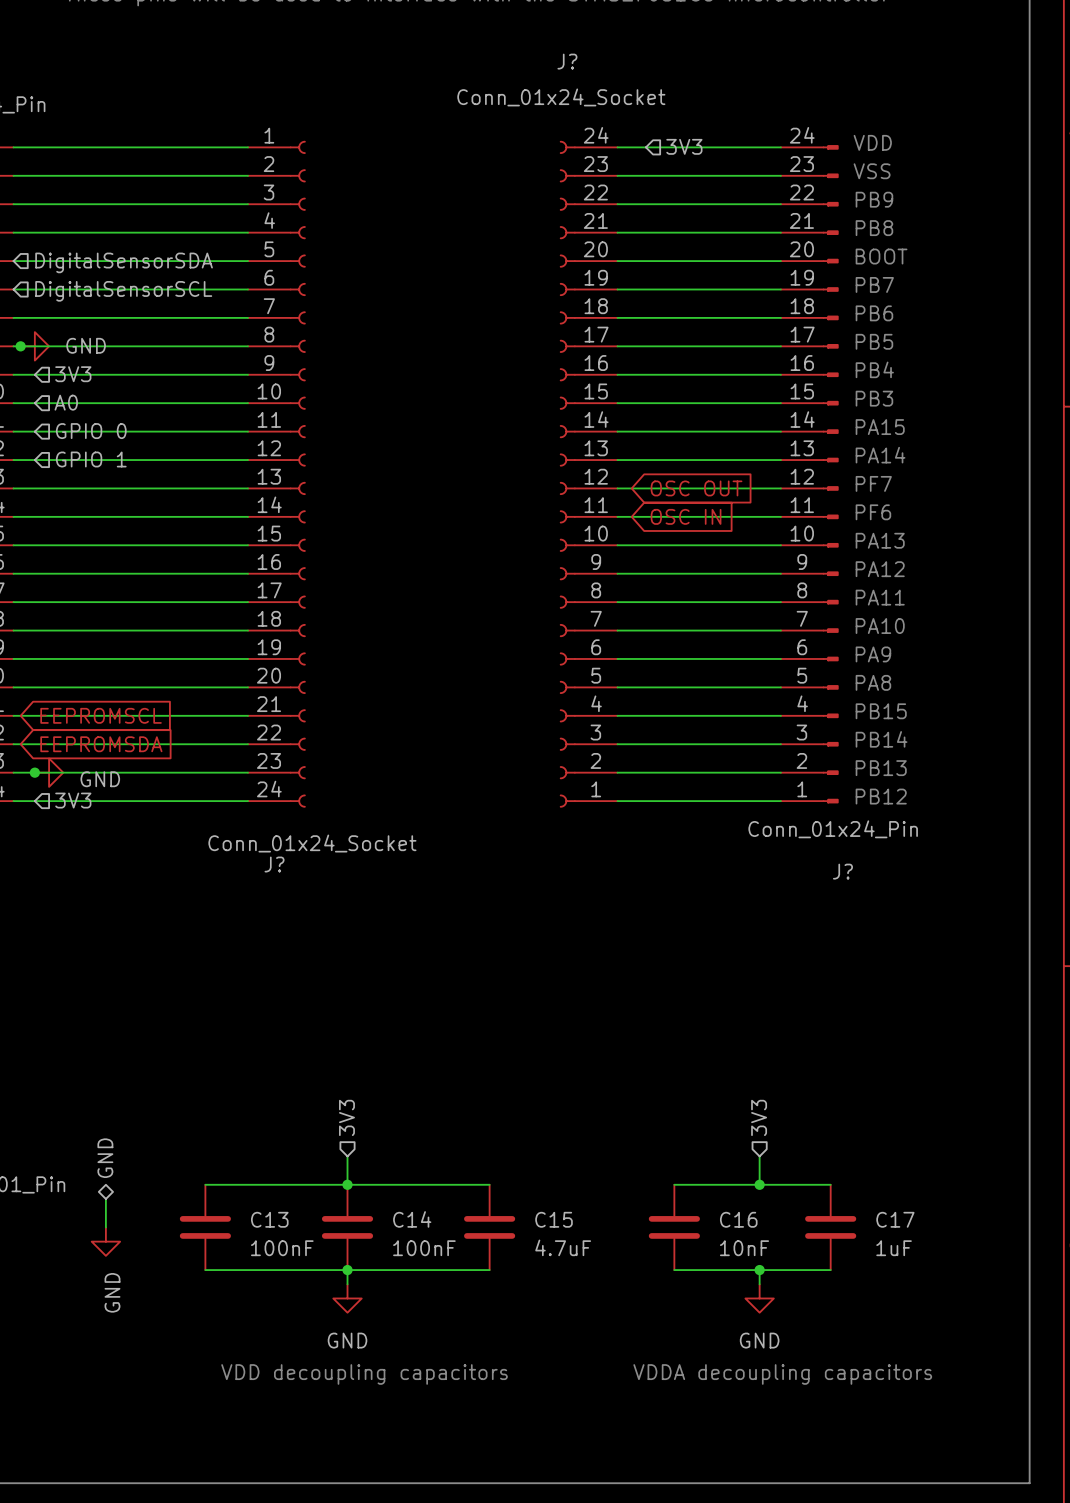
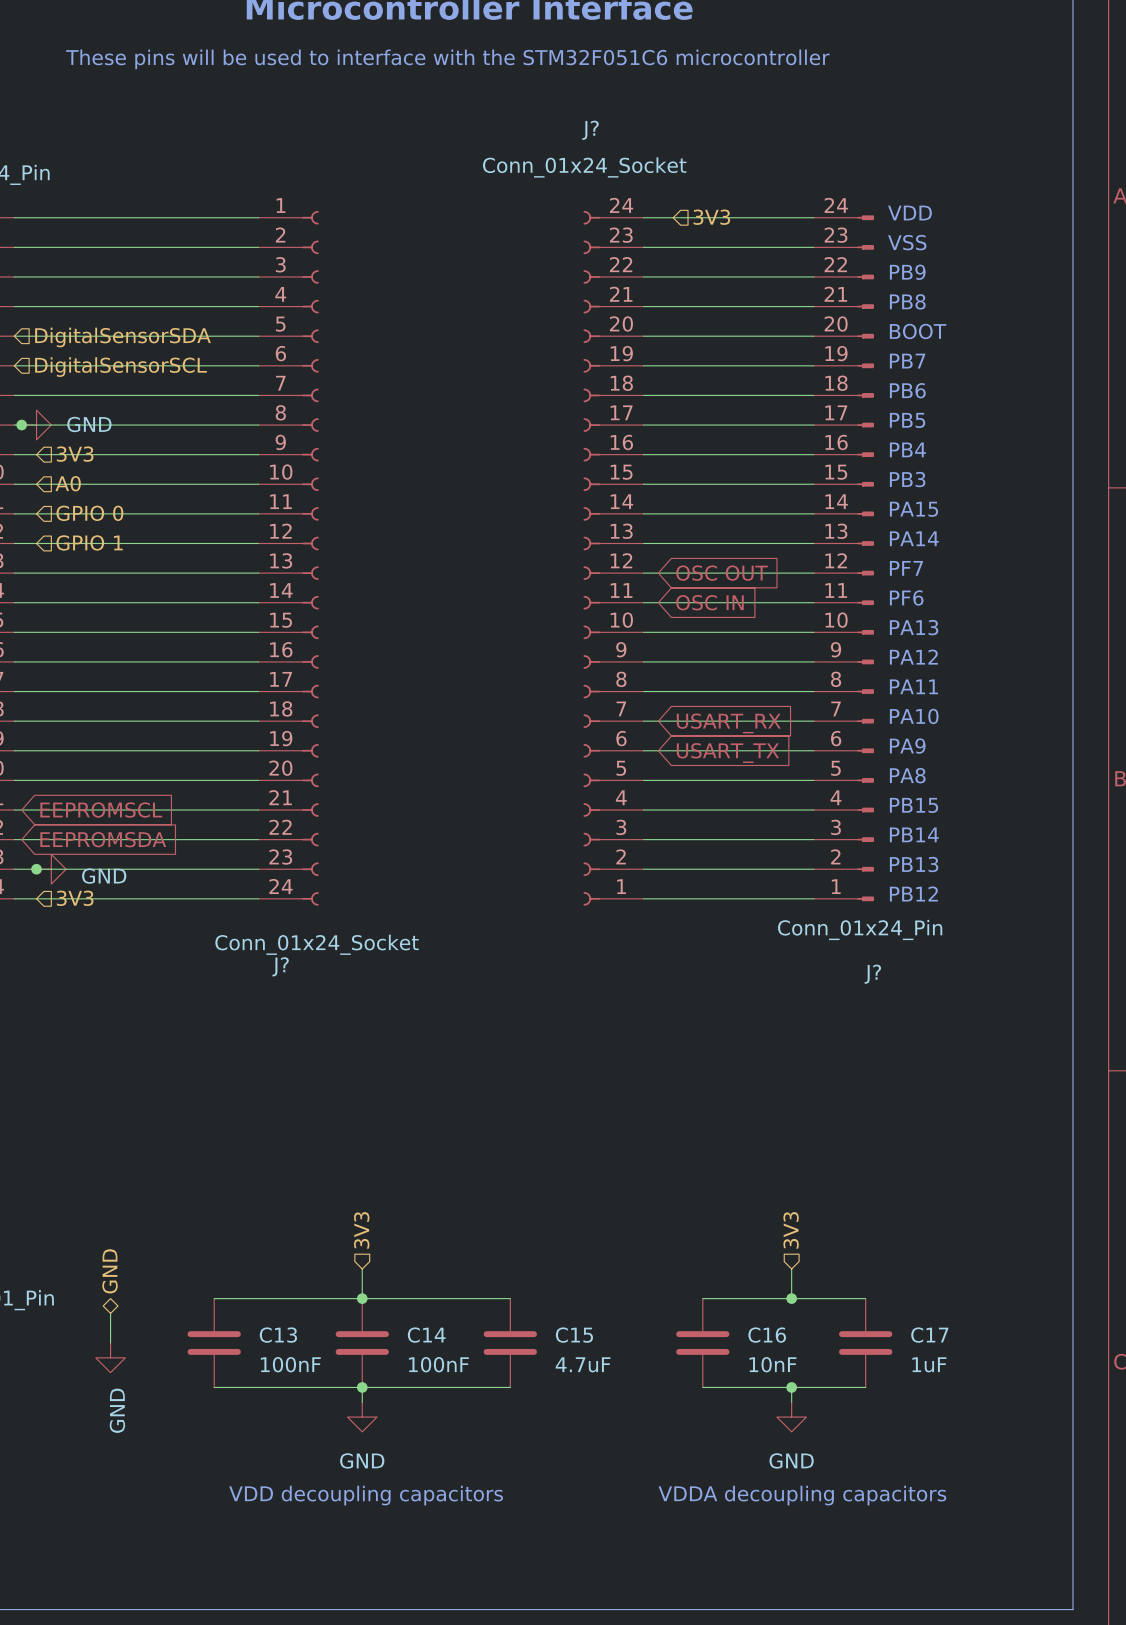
global label: none -> USART_RX (728, 723)
global label: none -> USART_TX (727, 753)

